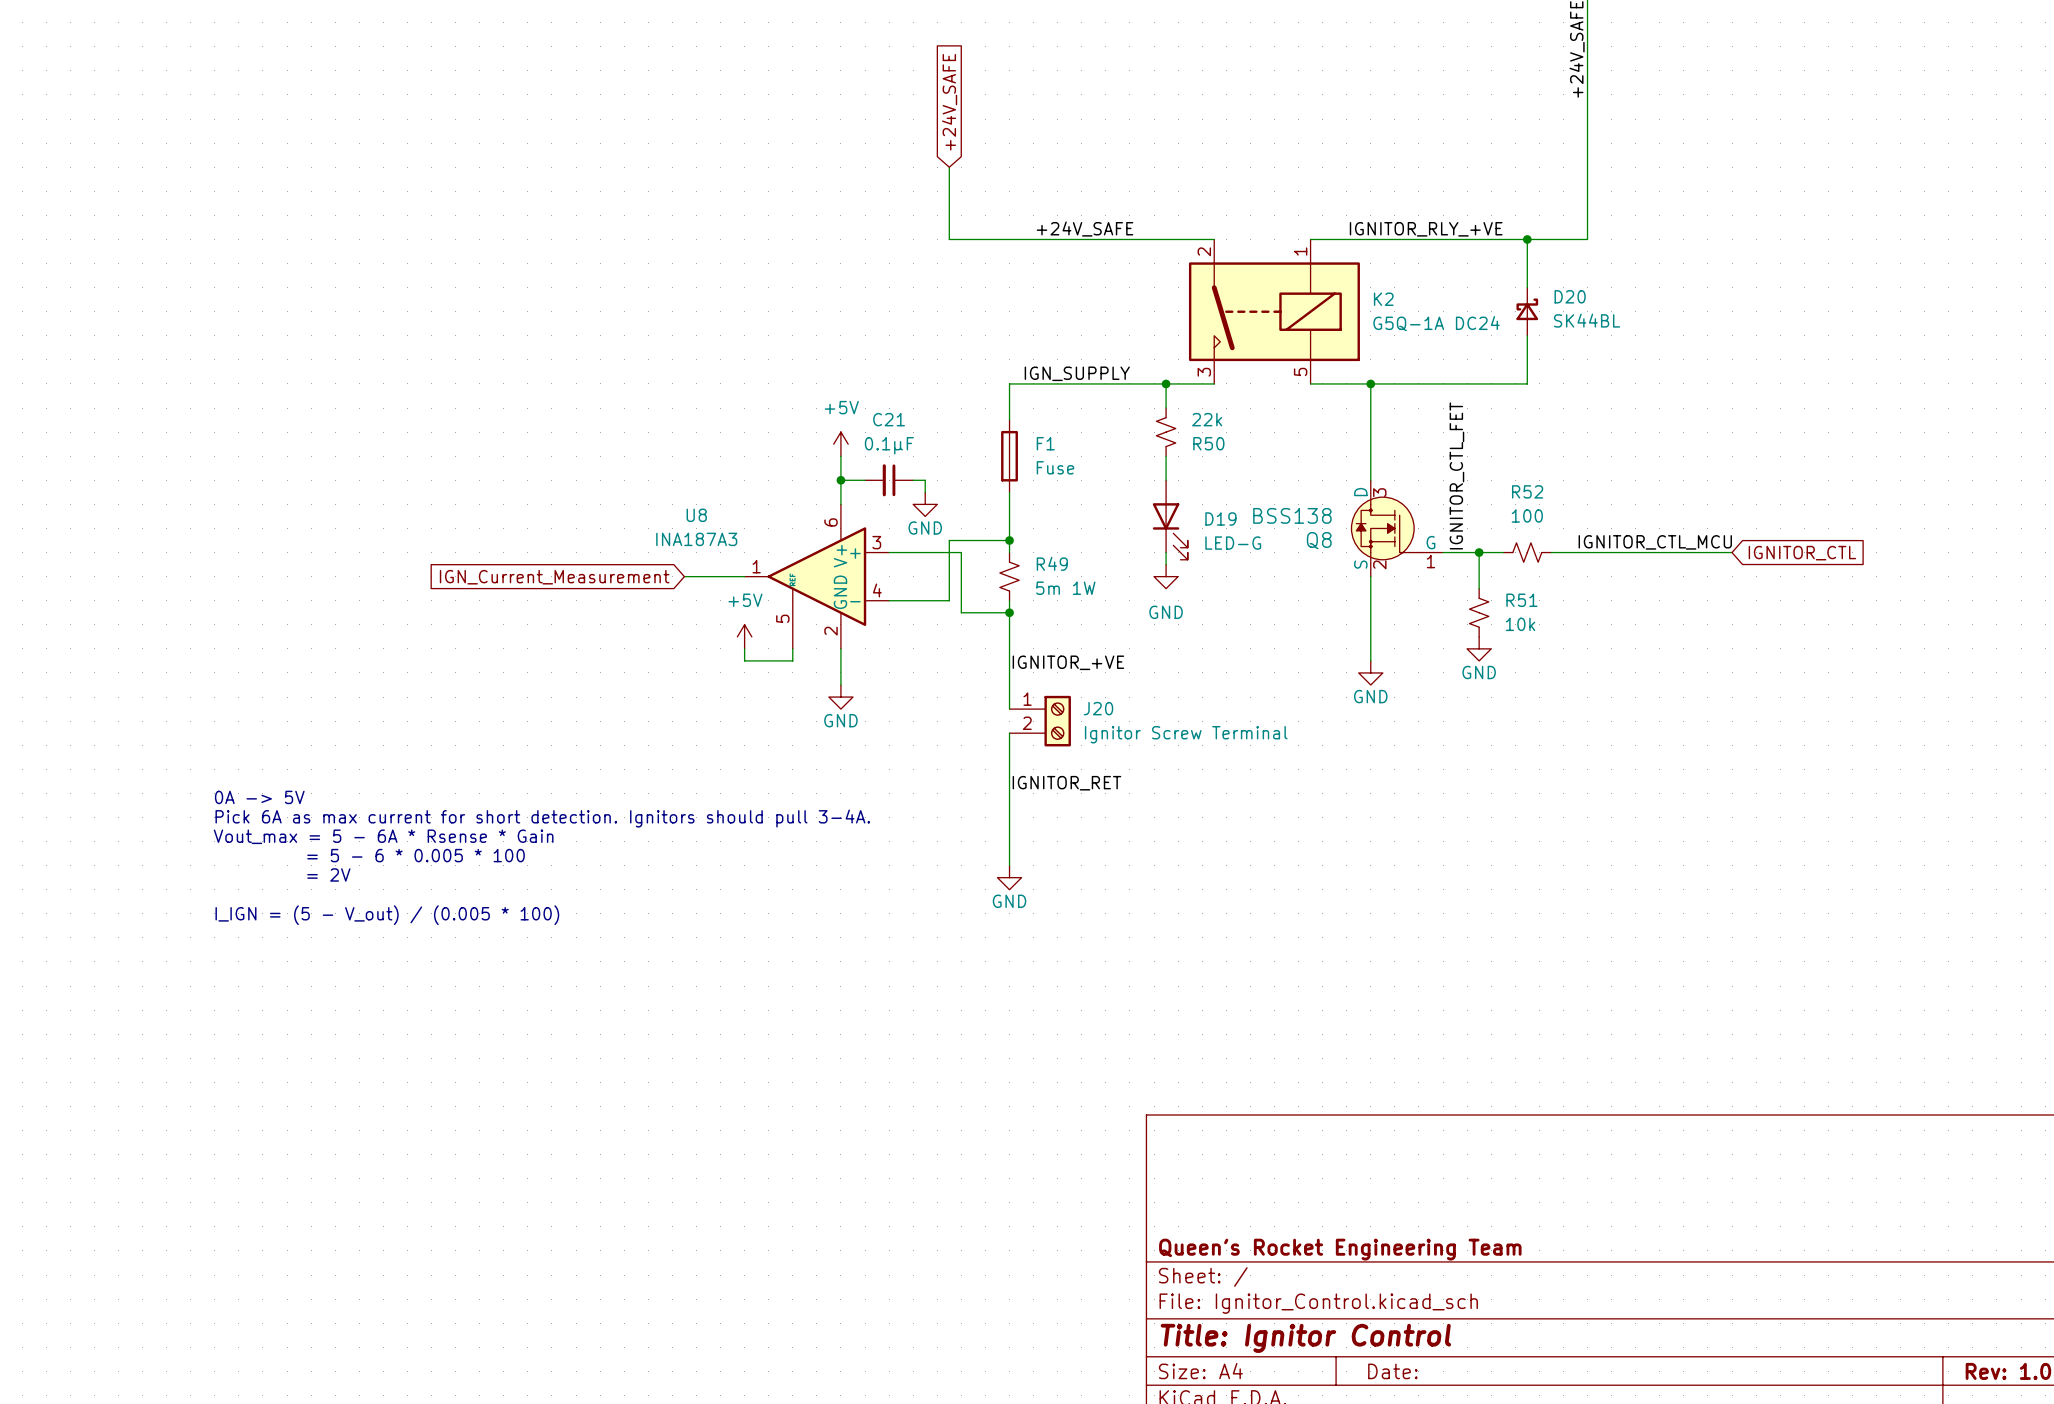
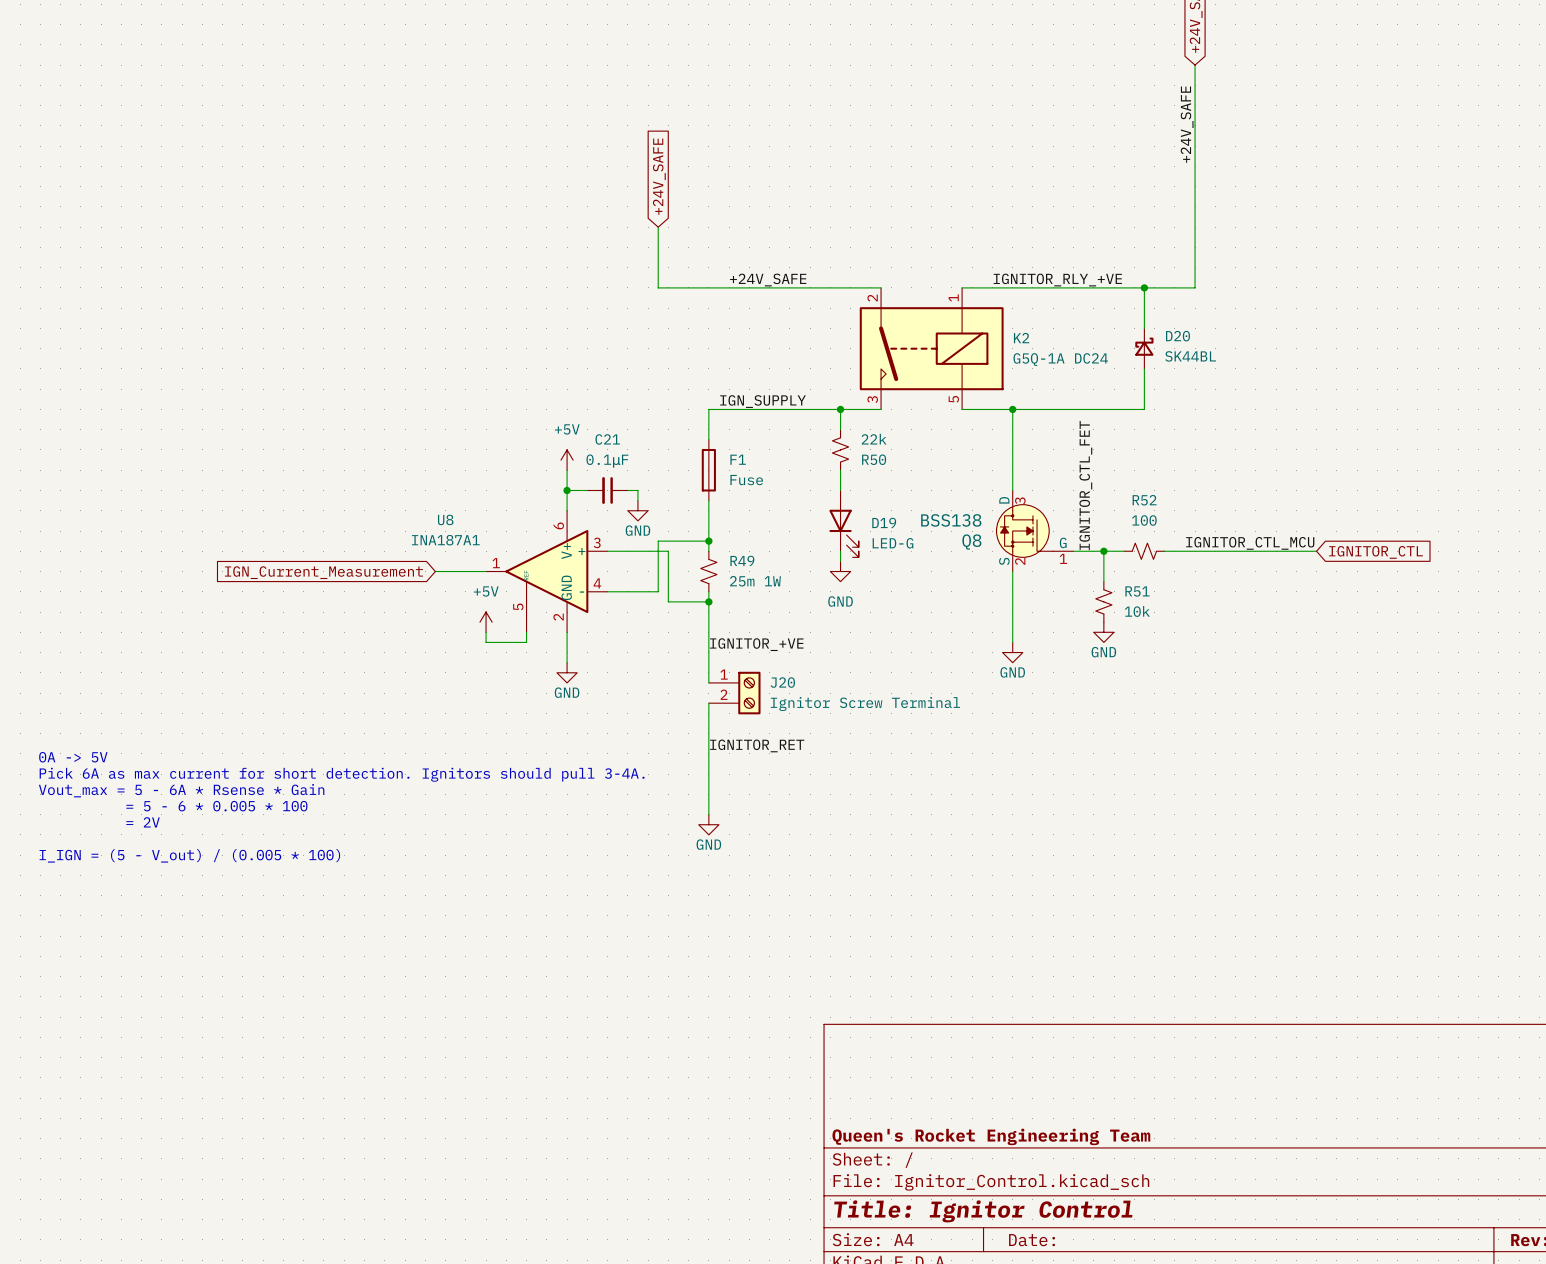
U8 value: INA187A3 (696, 539) -> INA187A1 (445, 540)
R49 value: 5m 1W (1065, 588) -> 25m 1W (755, 581)

